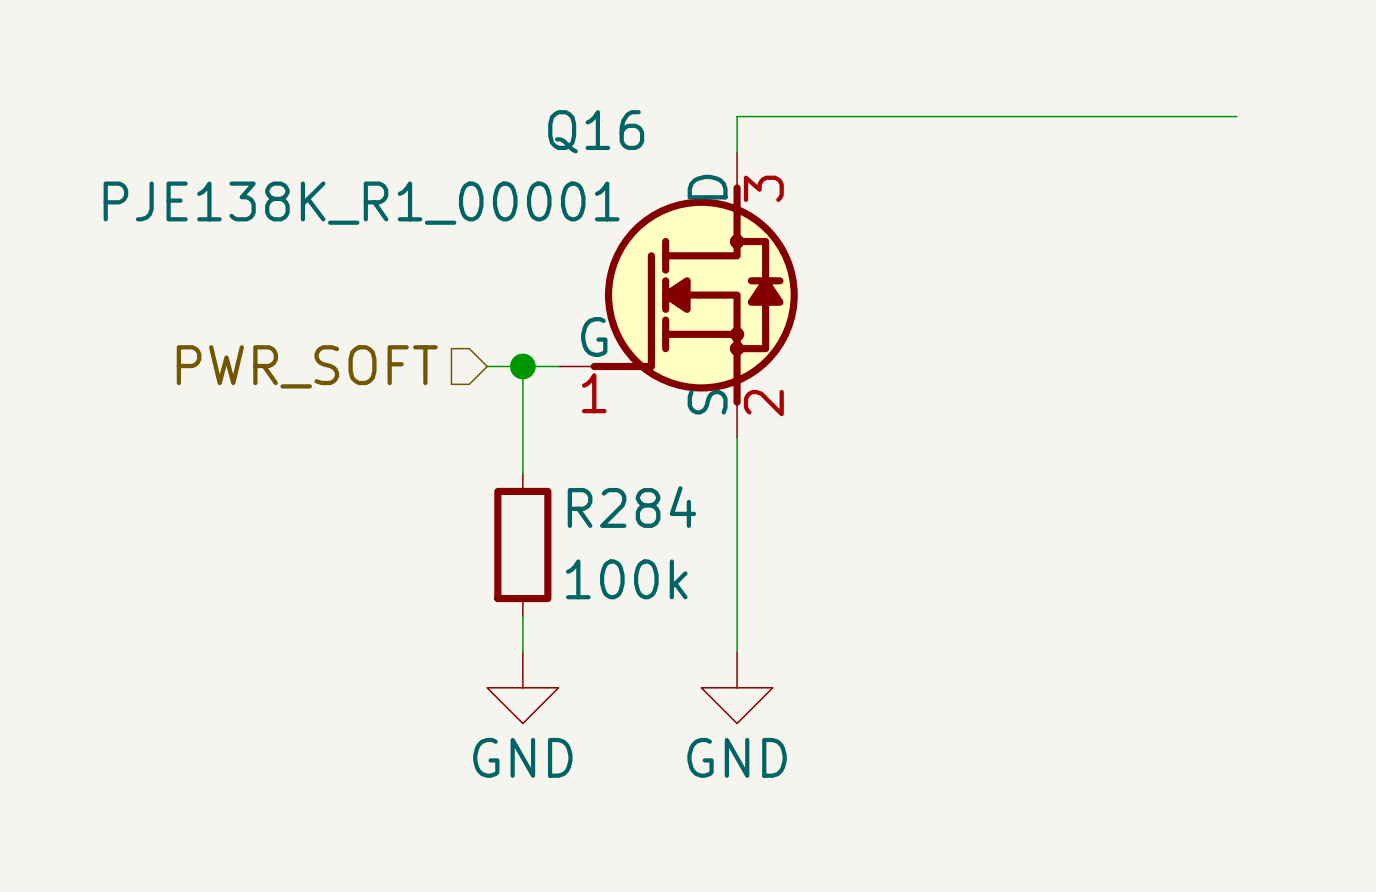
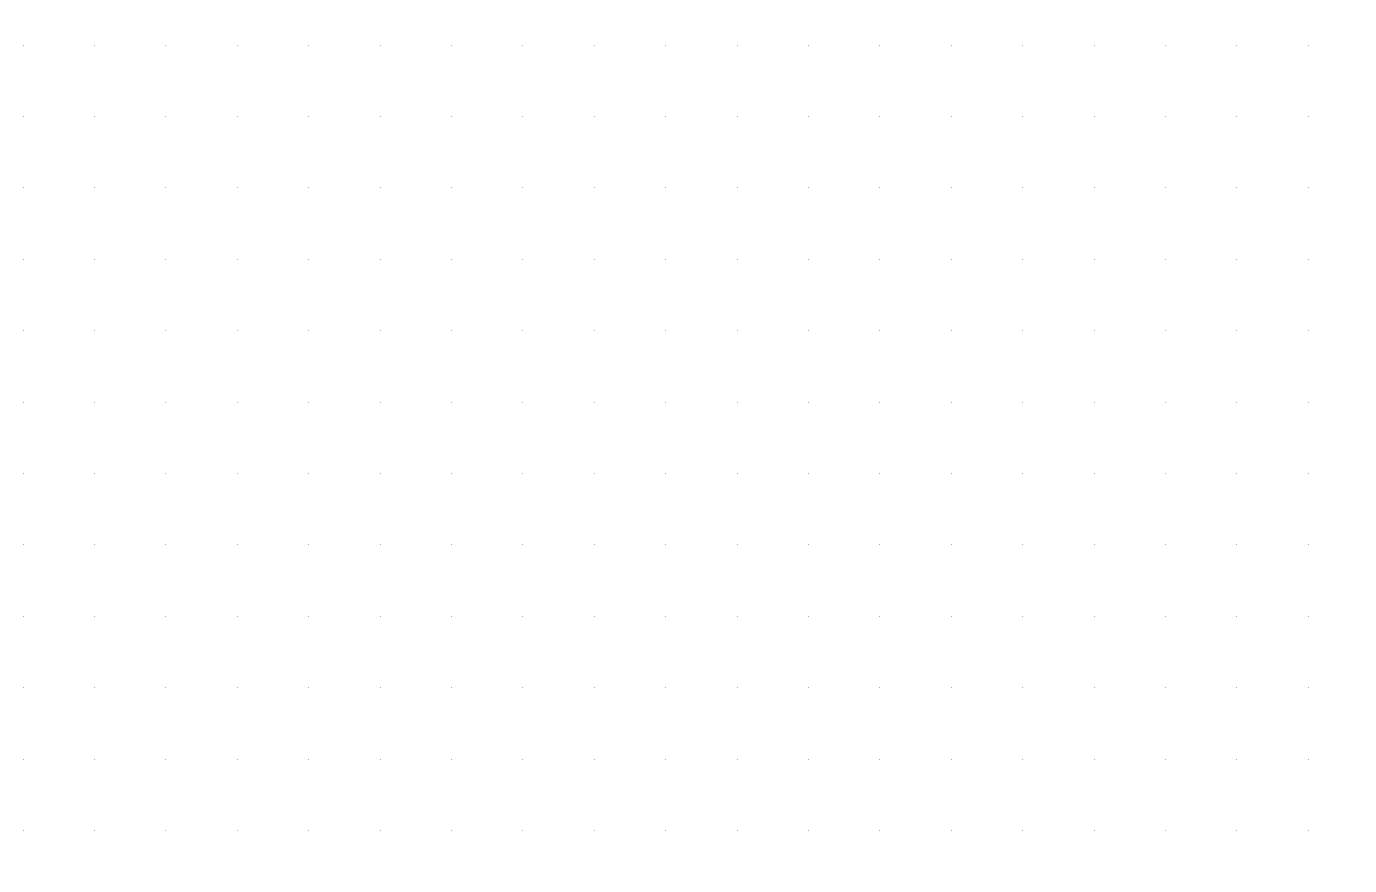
wire: (1236, 116) (737, 116) (737, 152) -> none
Q16: (678, 295) -> none
hierarchical label: PWR_SOFT (307, 366) -> none
wire: (487, 366) (558, 366) -> none
wire: (522, 366) (522, 473) -> none
junction: (522, 366) -> none
wire: (737, 437) (737, 652) -> none
R284: (522, 544) -> none
wire: (522, 616) (522, 652) -> none
power symbol: GND (522, 687) -> none
power symbol: GND (737, 687) -> none

